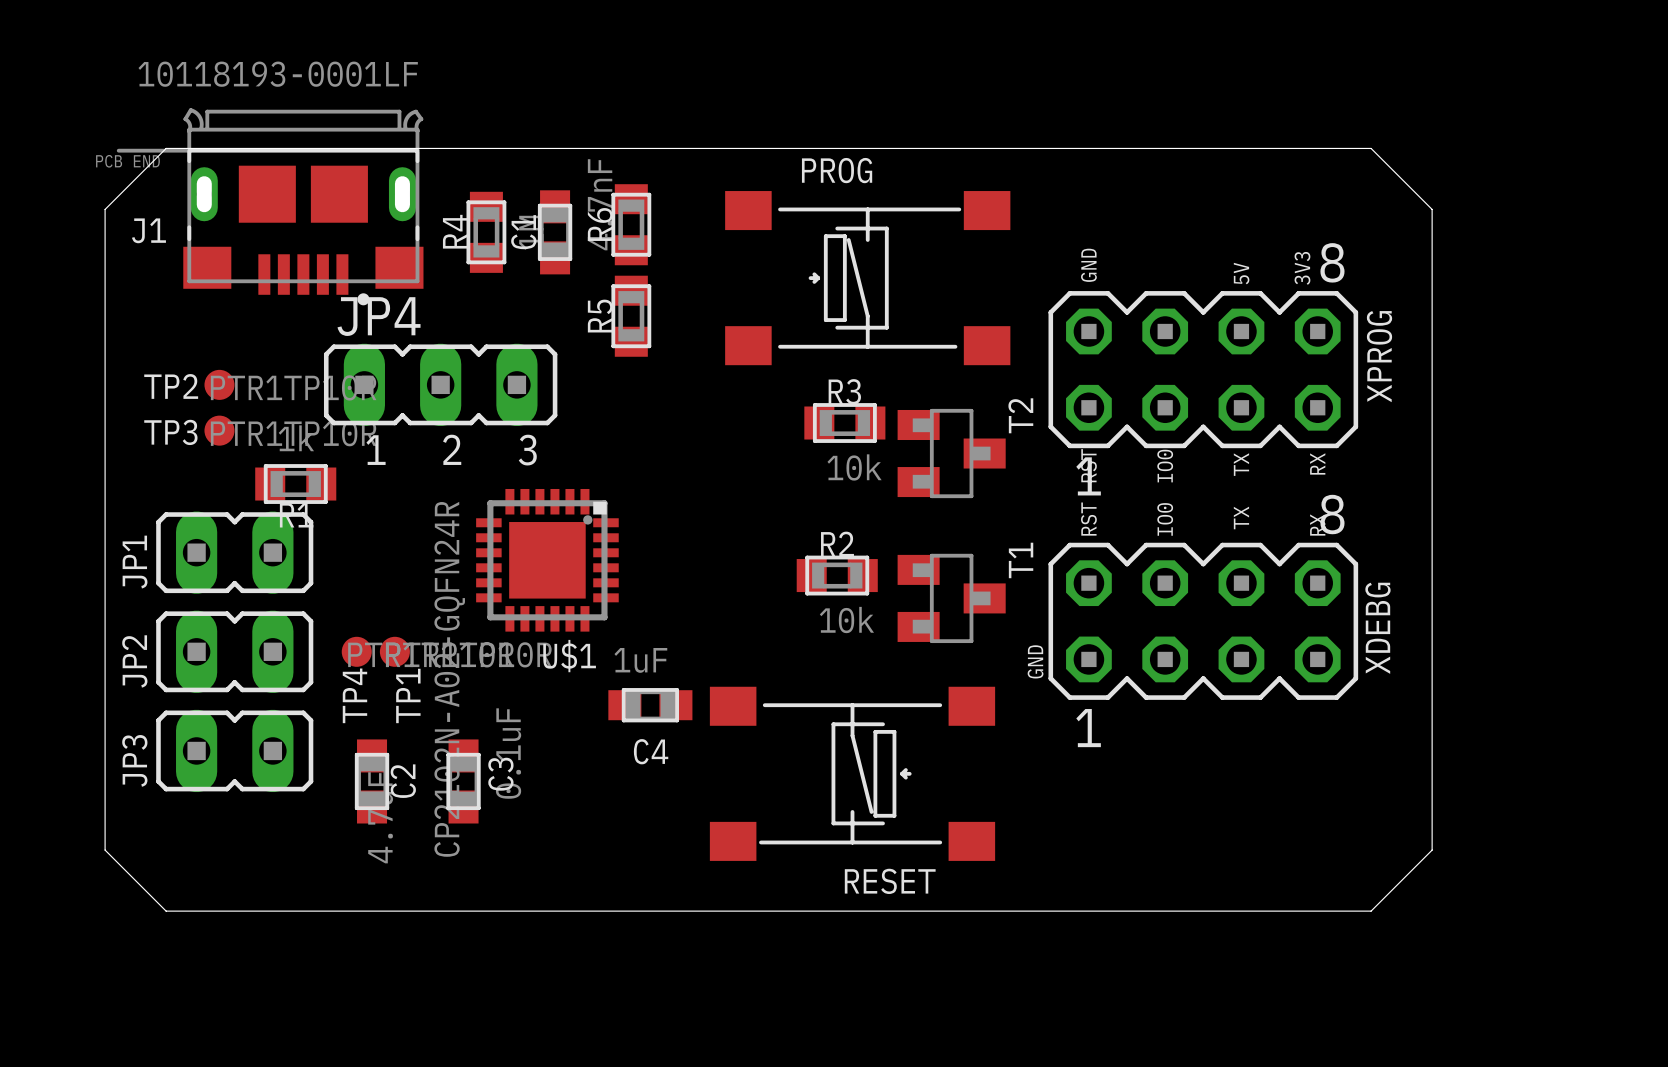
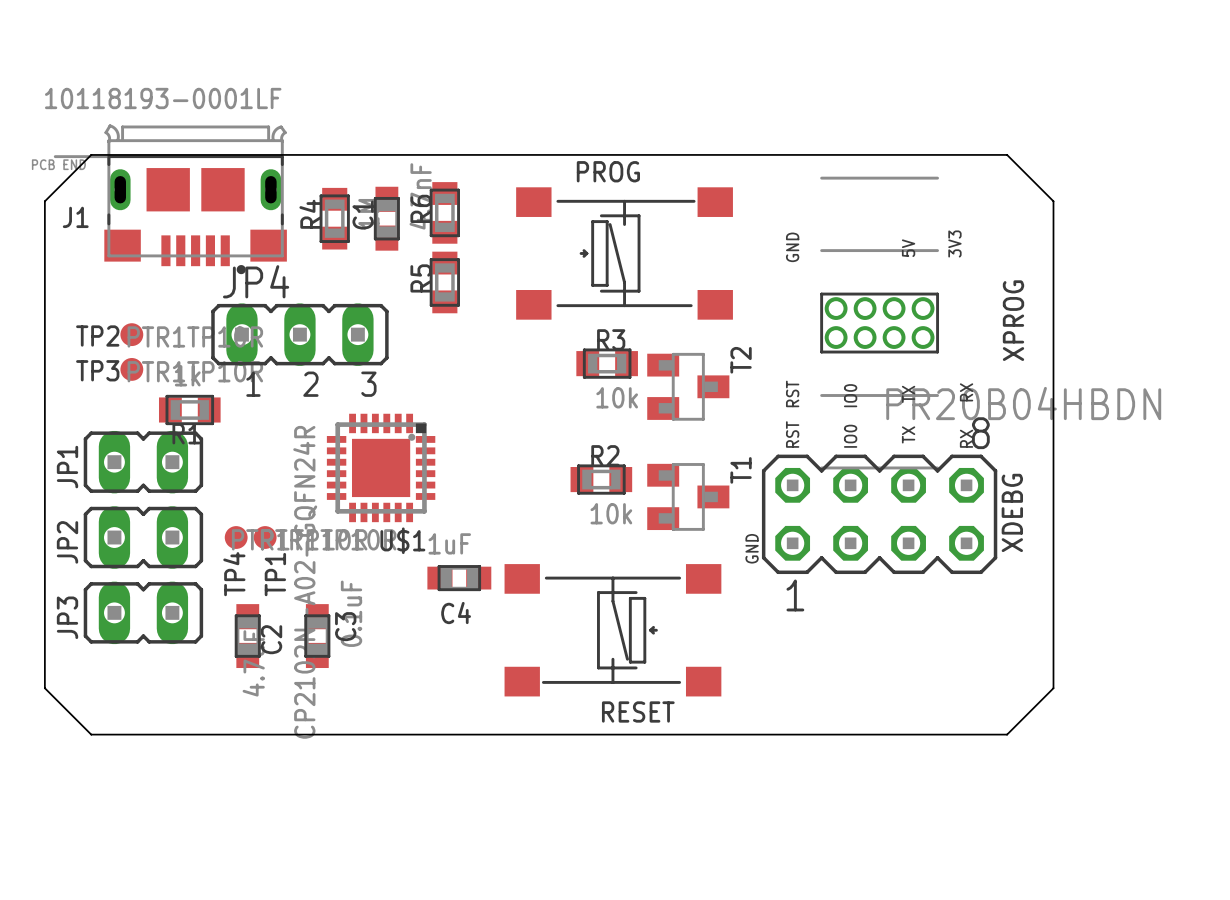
XPROG footprint: [1048, 291, 1359, 449] -> [820, 176, 940, 470]
XPROG value: none -> PR20B04HBDN (1023, 403)

